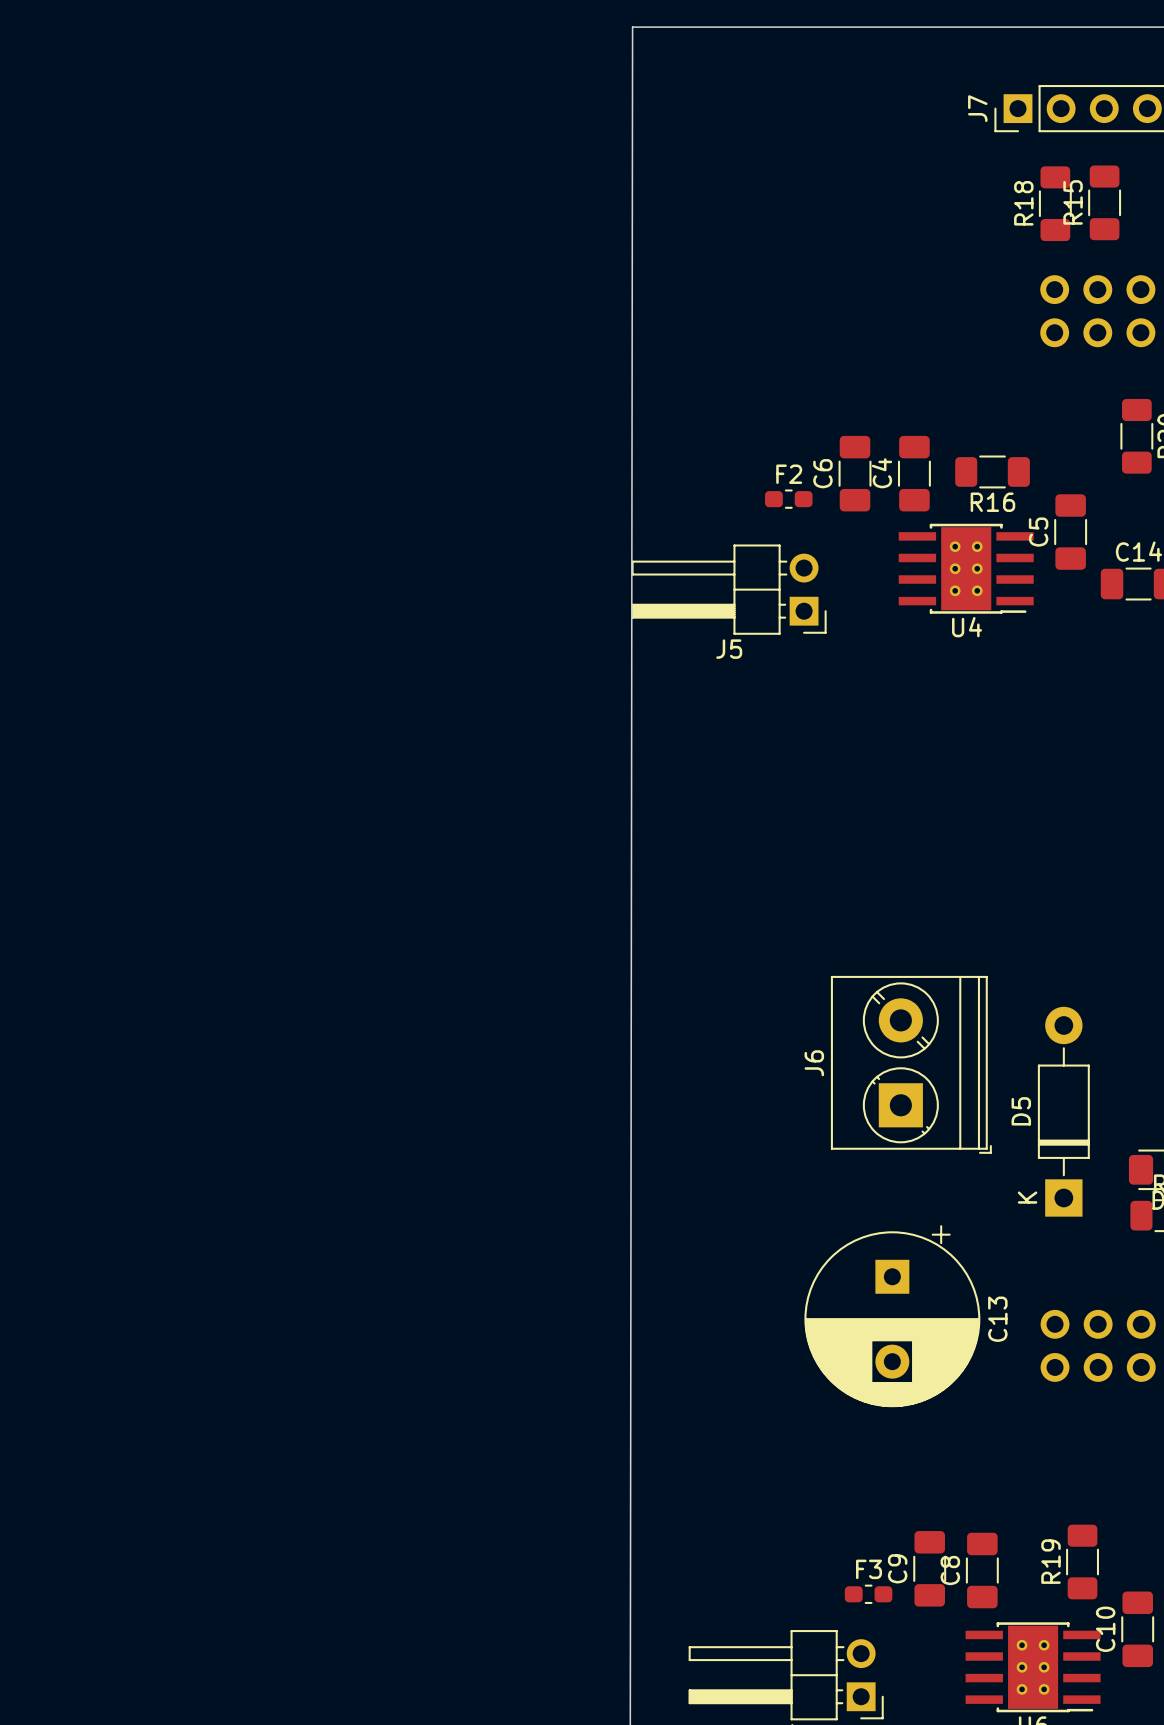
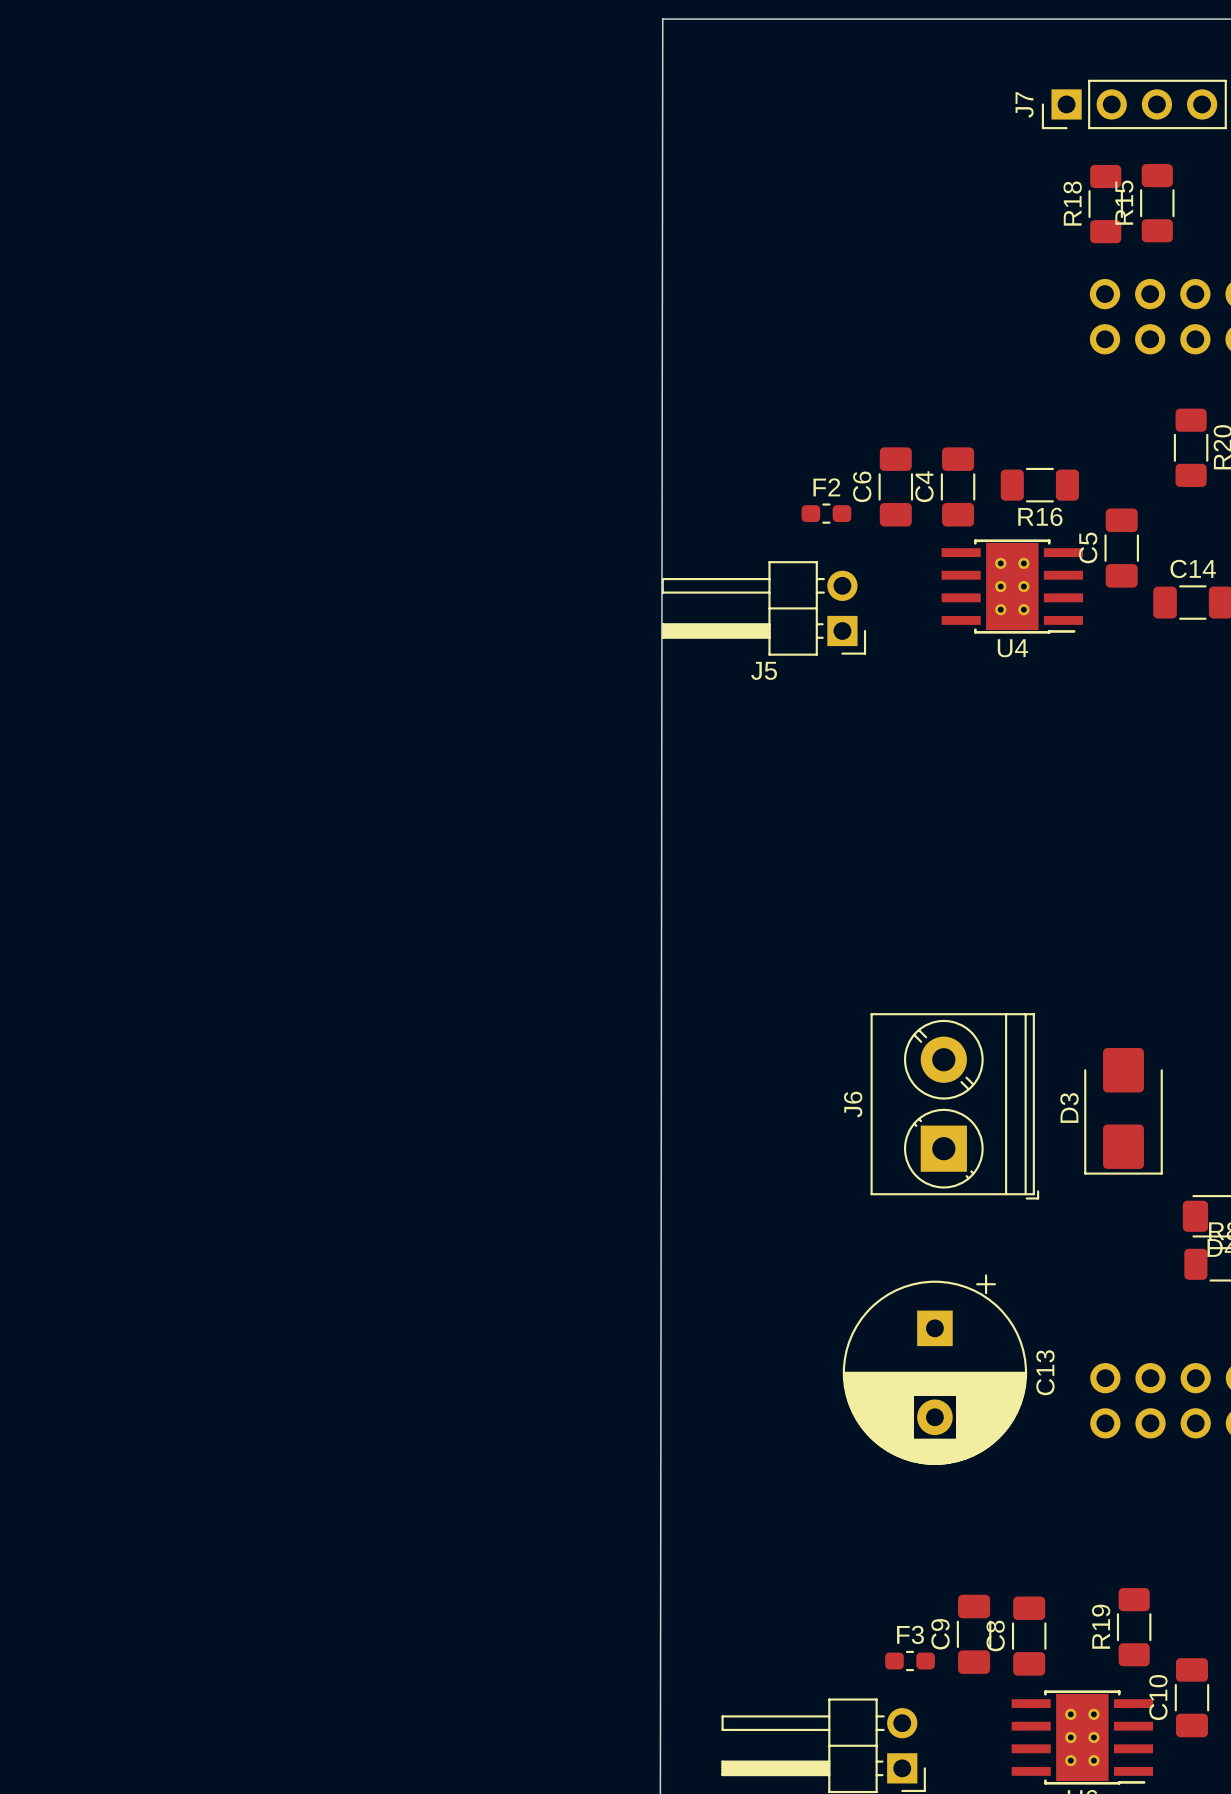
D3: none -> (1123, 1111)
D5: (1063, 1111) -> none

